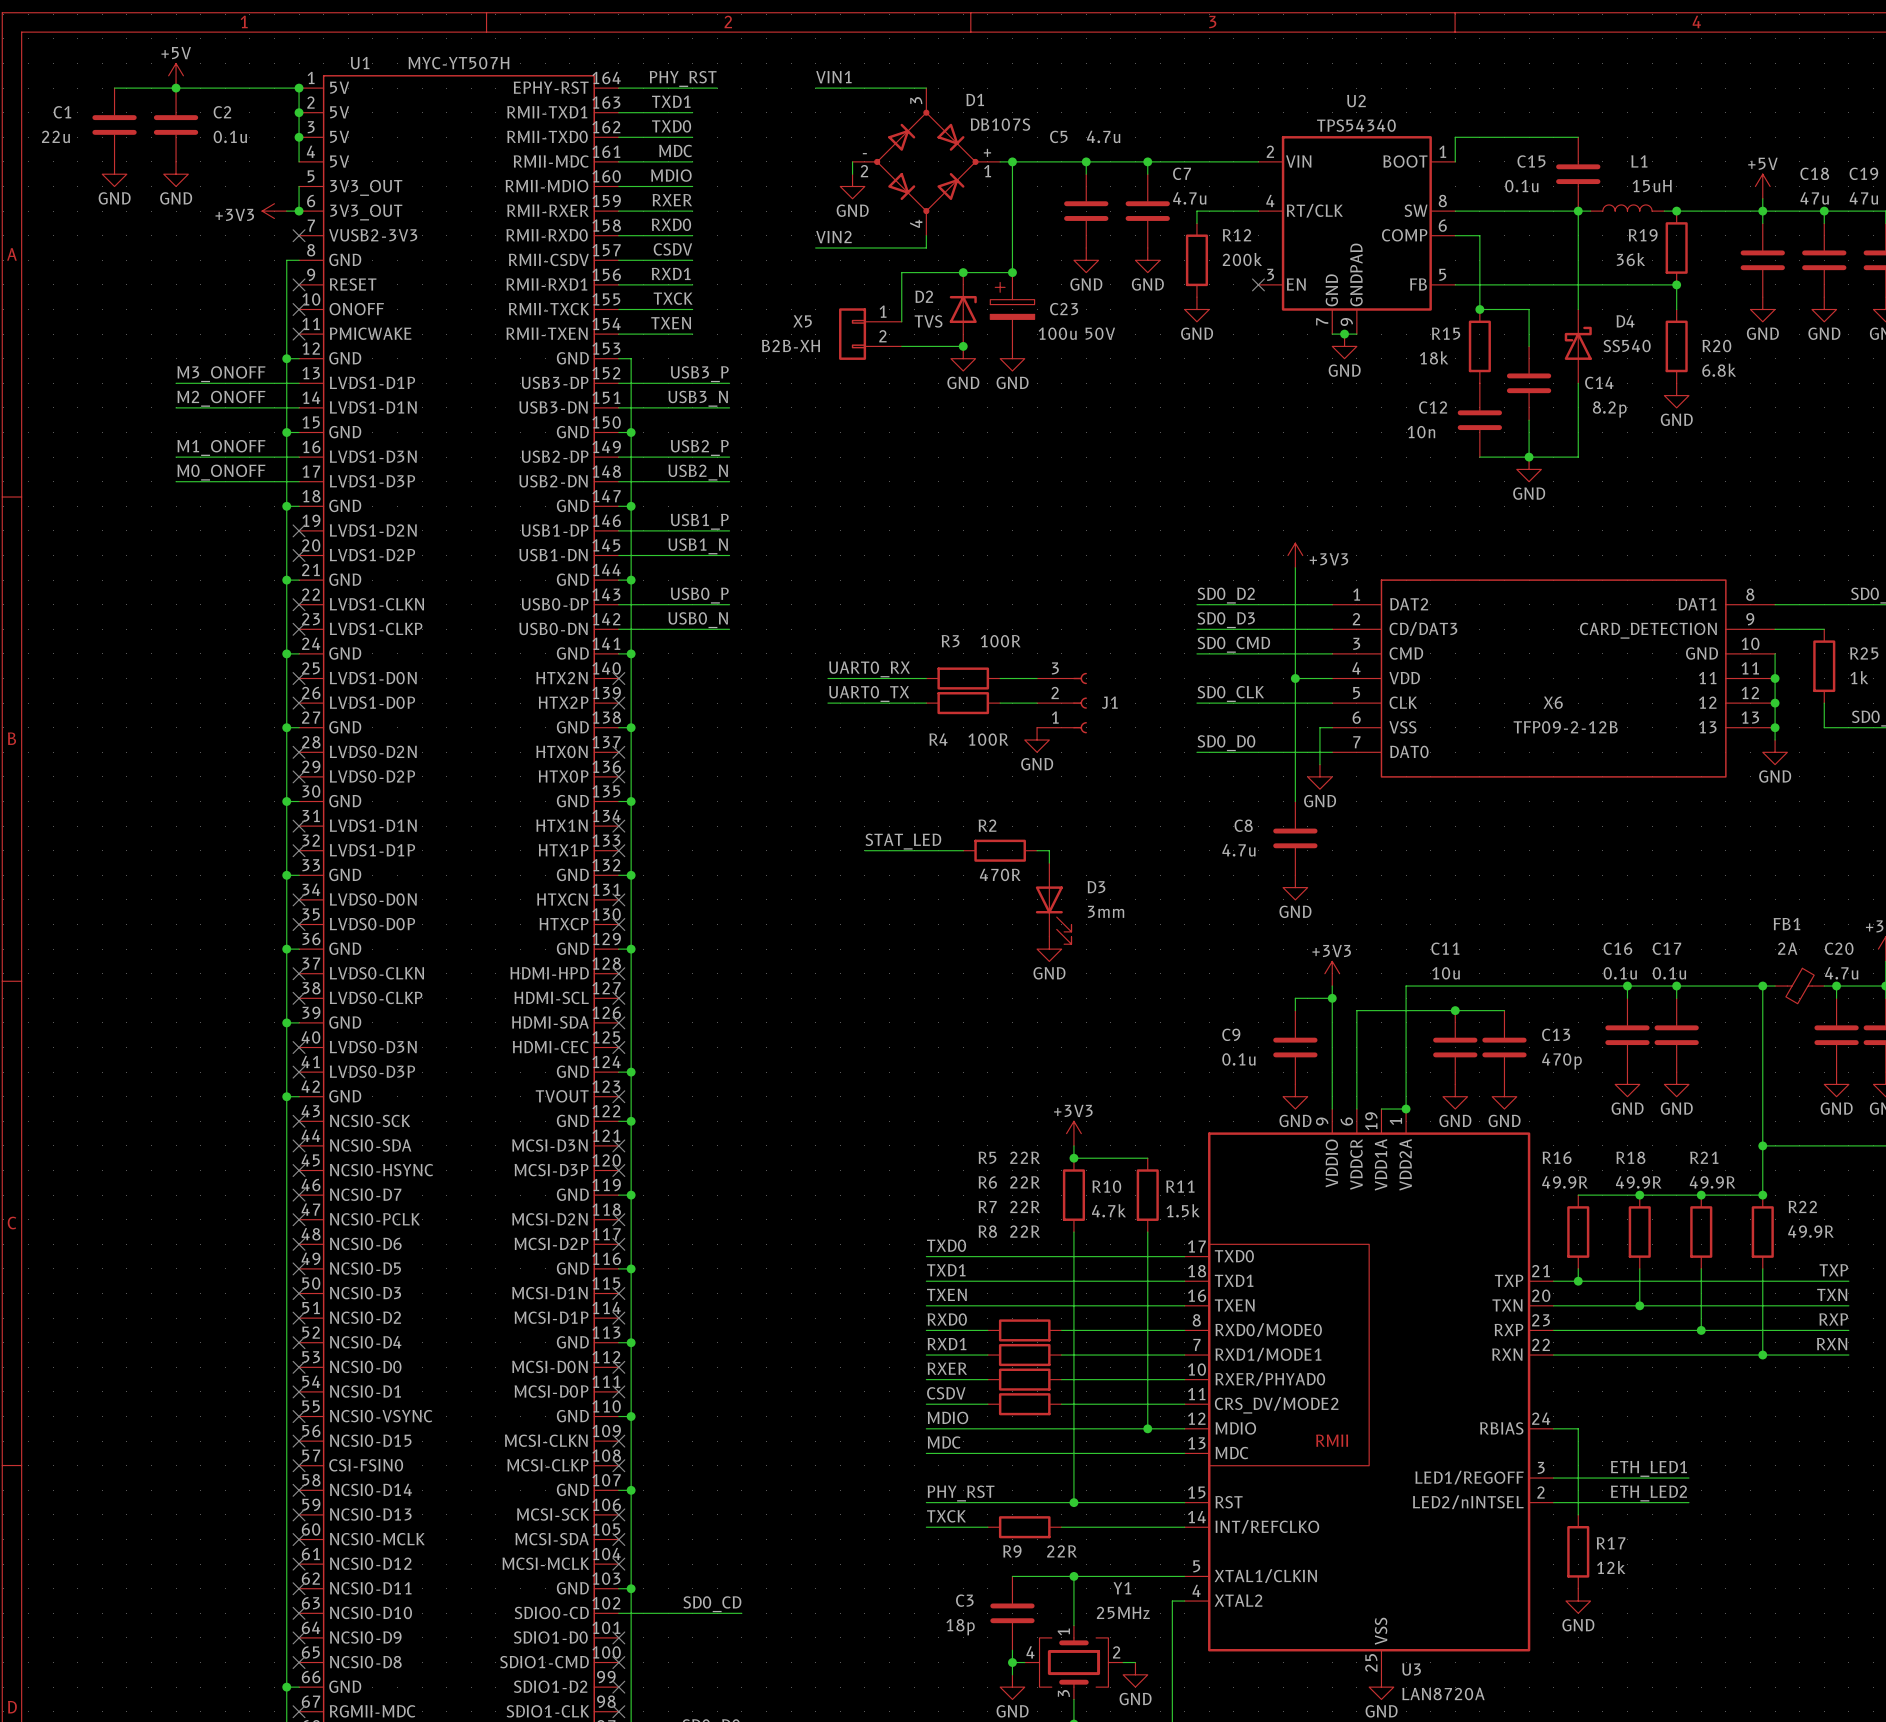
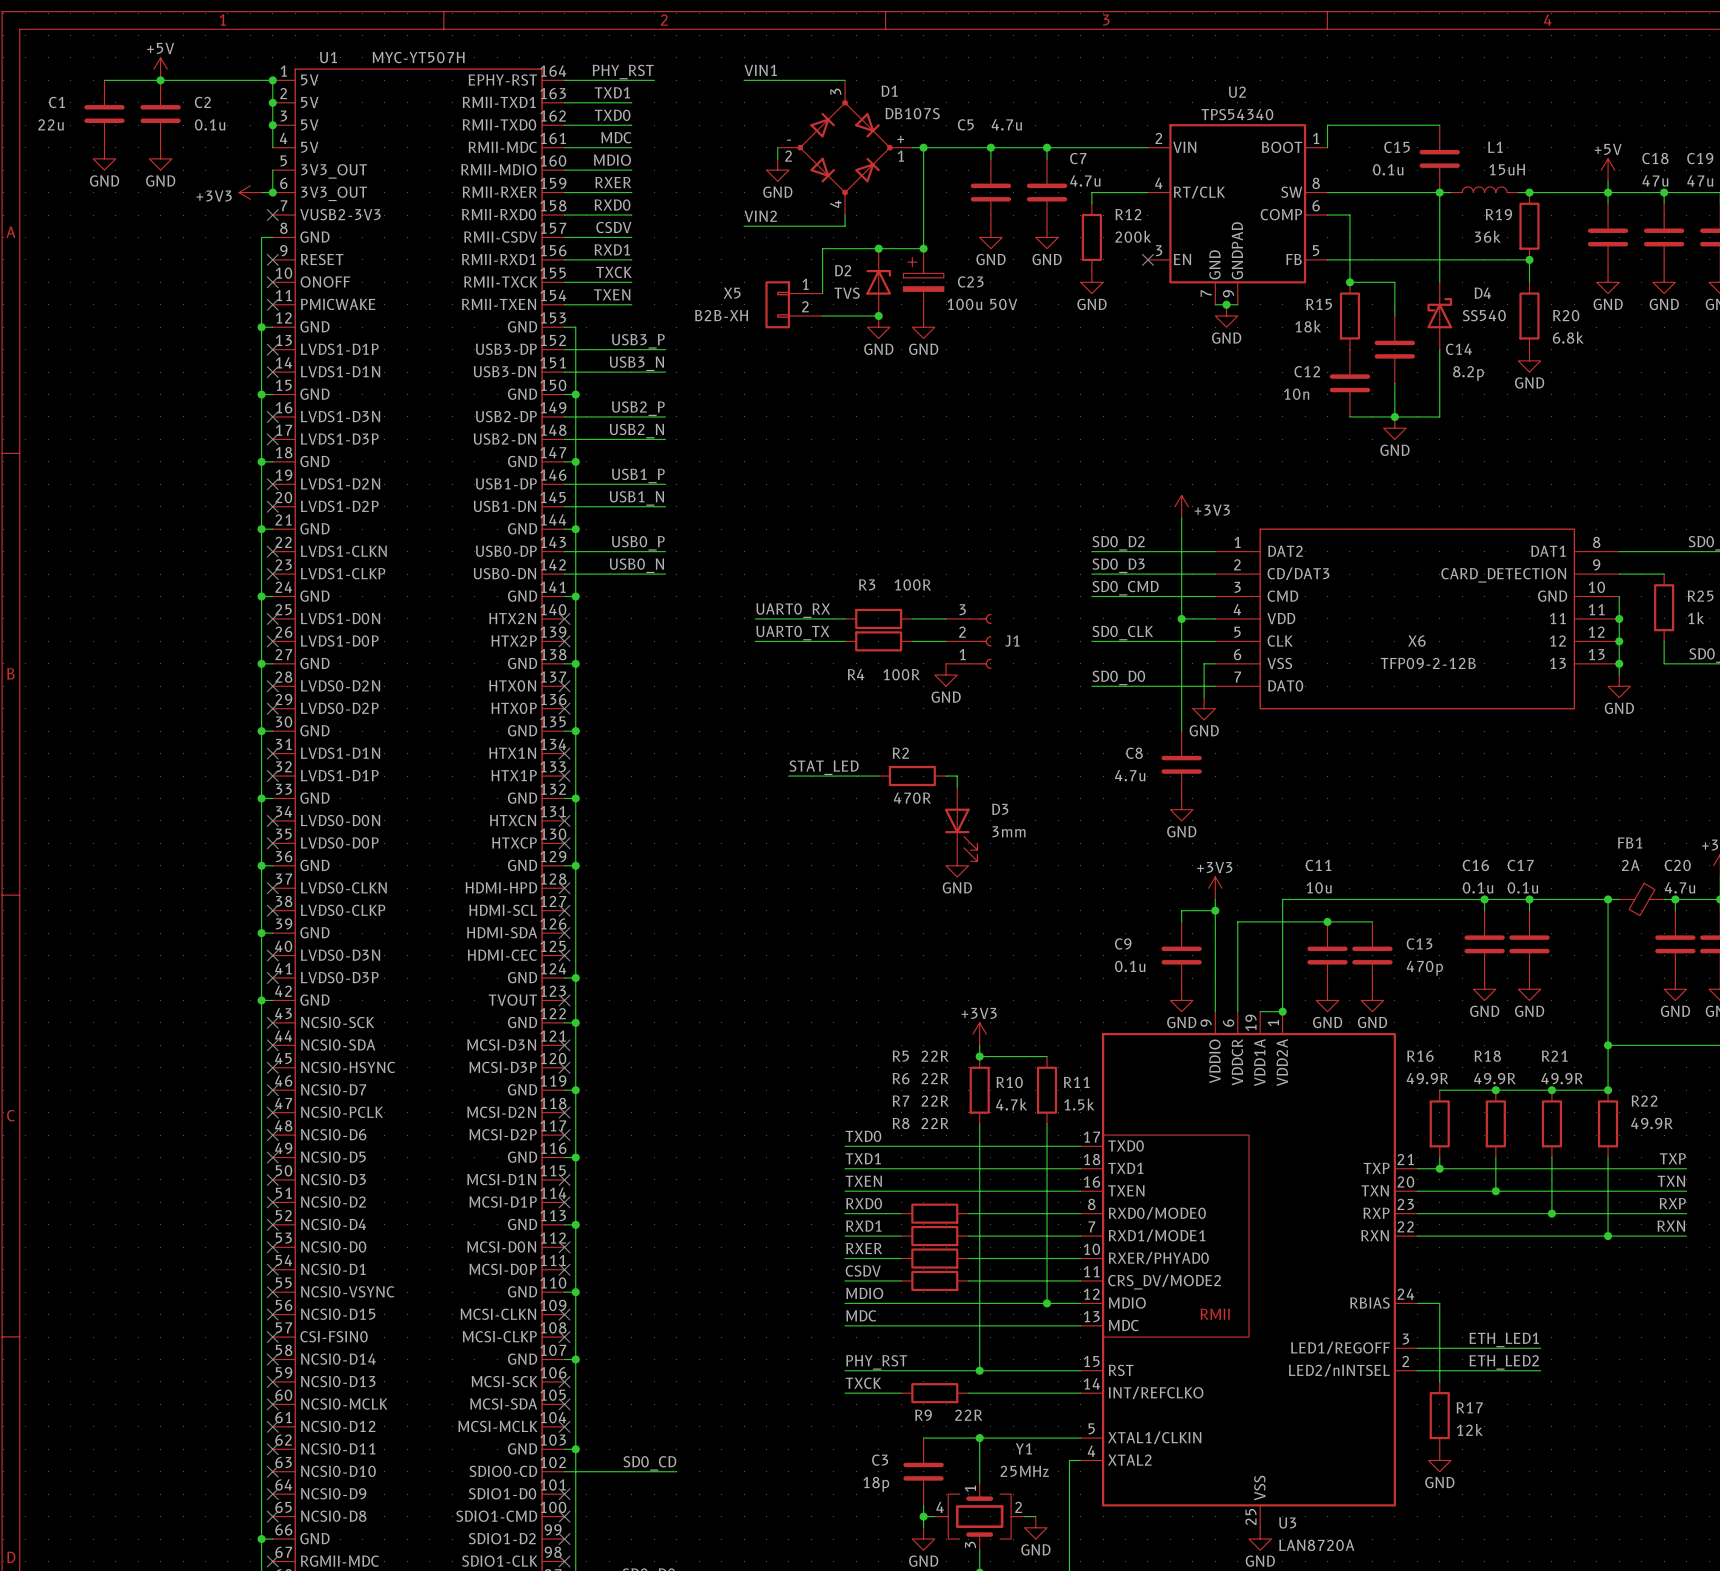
label: M3_ONOFF (221, 374) -> none
wire: (176, 383) (299, 383) -> none
no-connect mark: none -> (272, 349)
label: M2_ONOFF (221, 398) -> none
wire: (176, 407) (299, 407) -> none
no-connect mark: none -> (272, 372)
label: M1_ONOFF (221, 447) -> none
wire: (176, 457) (299, 457) -> none
no-connect mark: none -> (272, 416)
label: M0_ONOFF (221, 472) -> none
wire: (176, 481) (299, 481) -> none
no-connect mark: none -> (272, 439)

